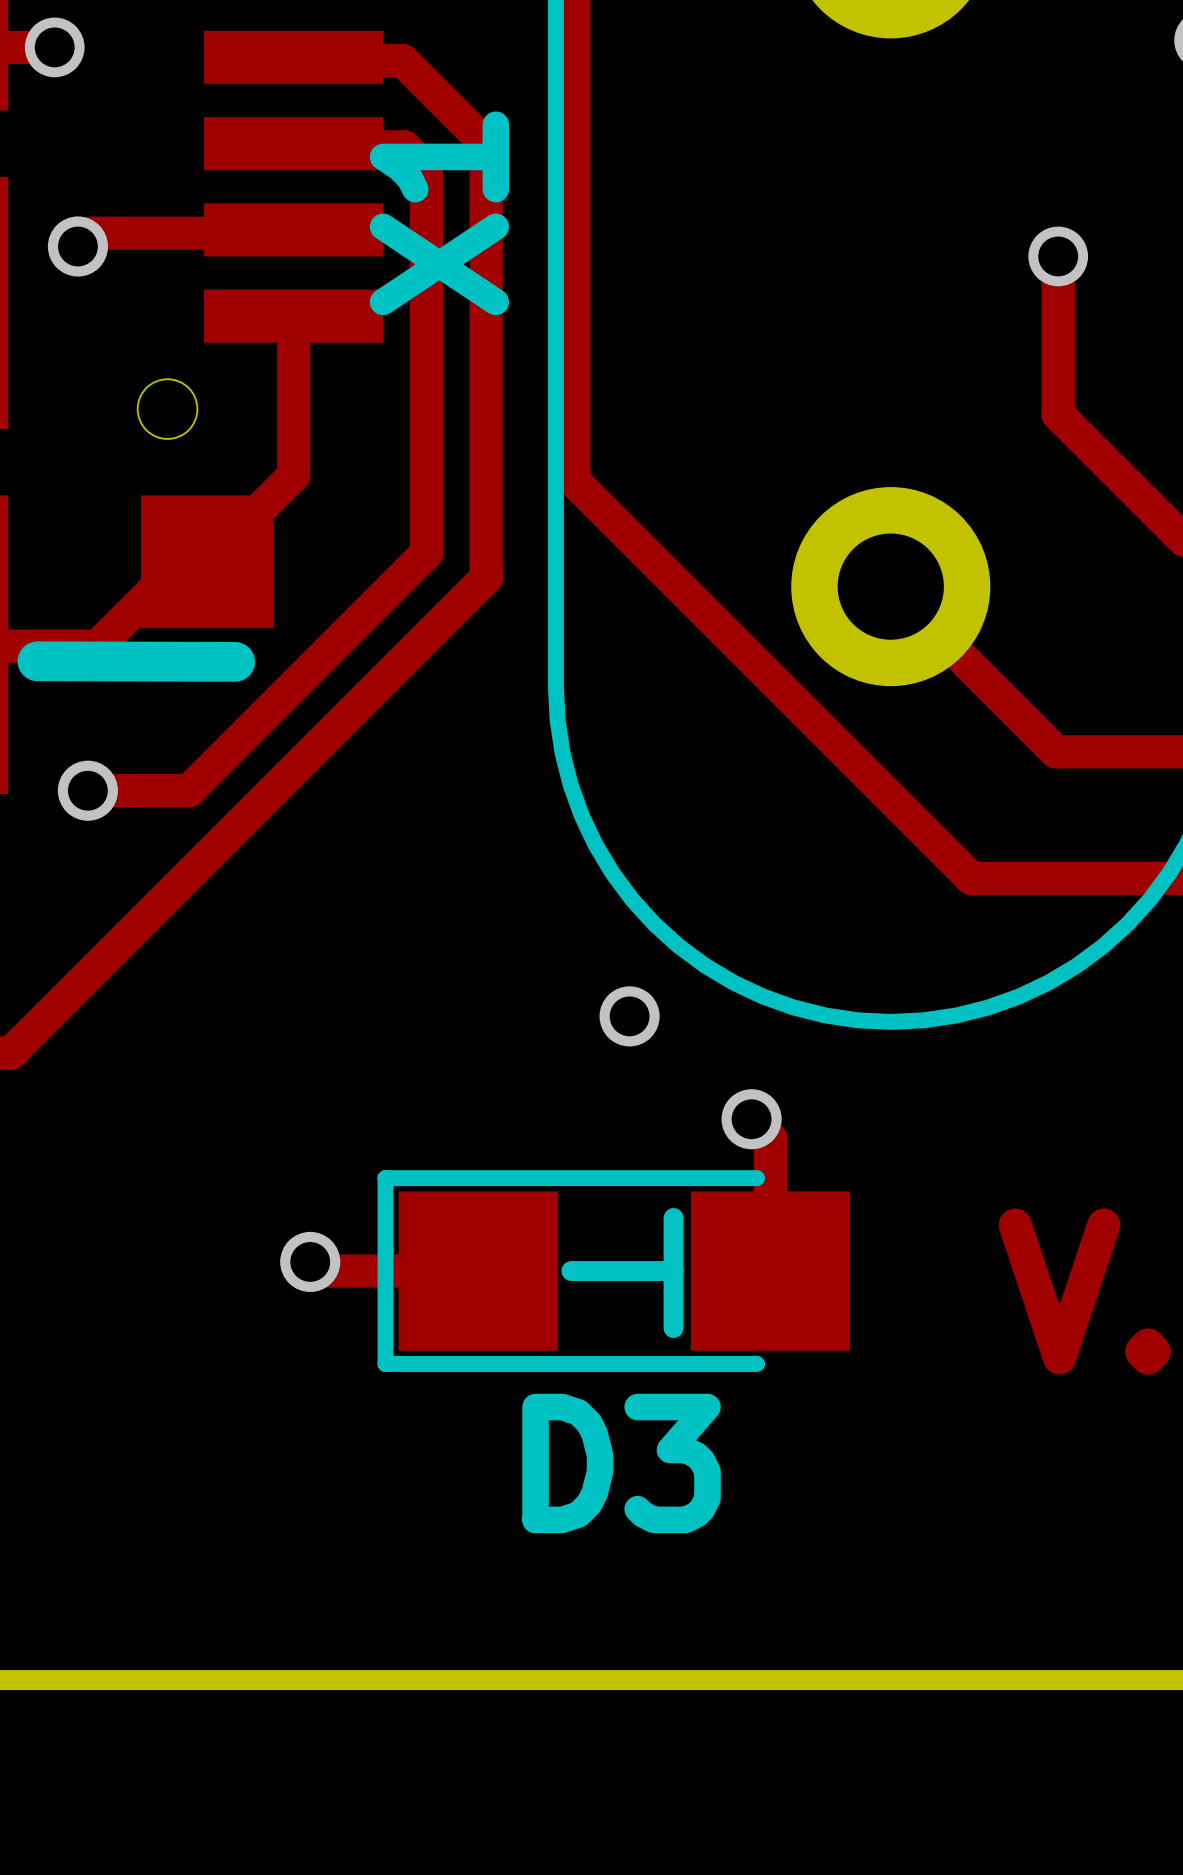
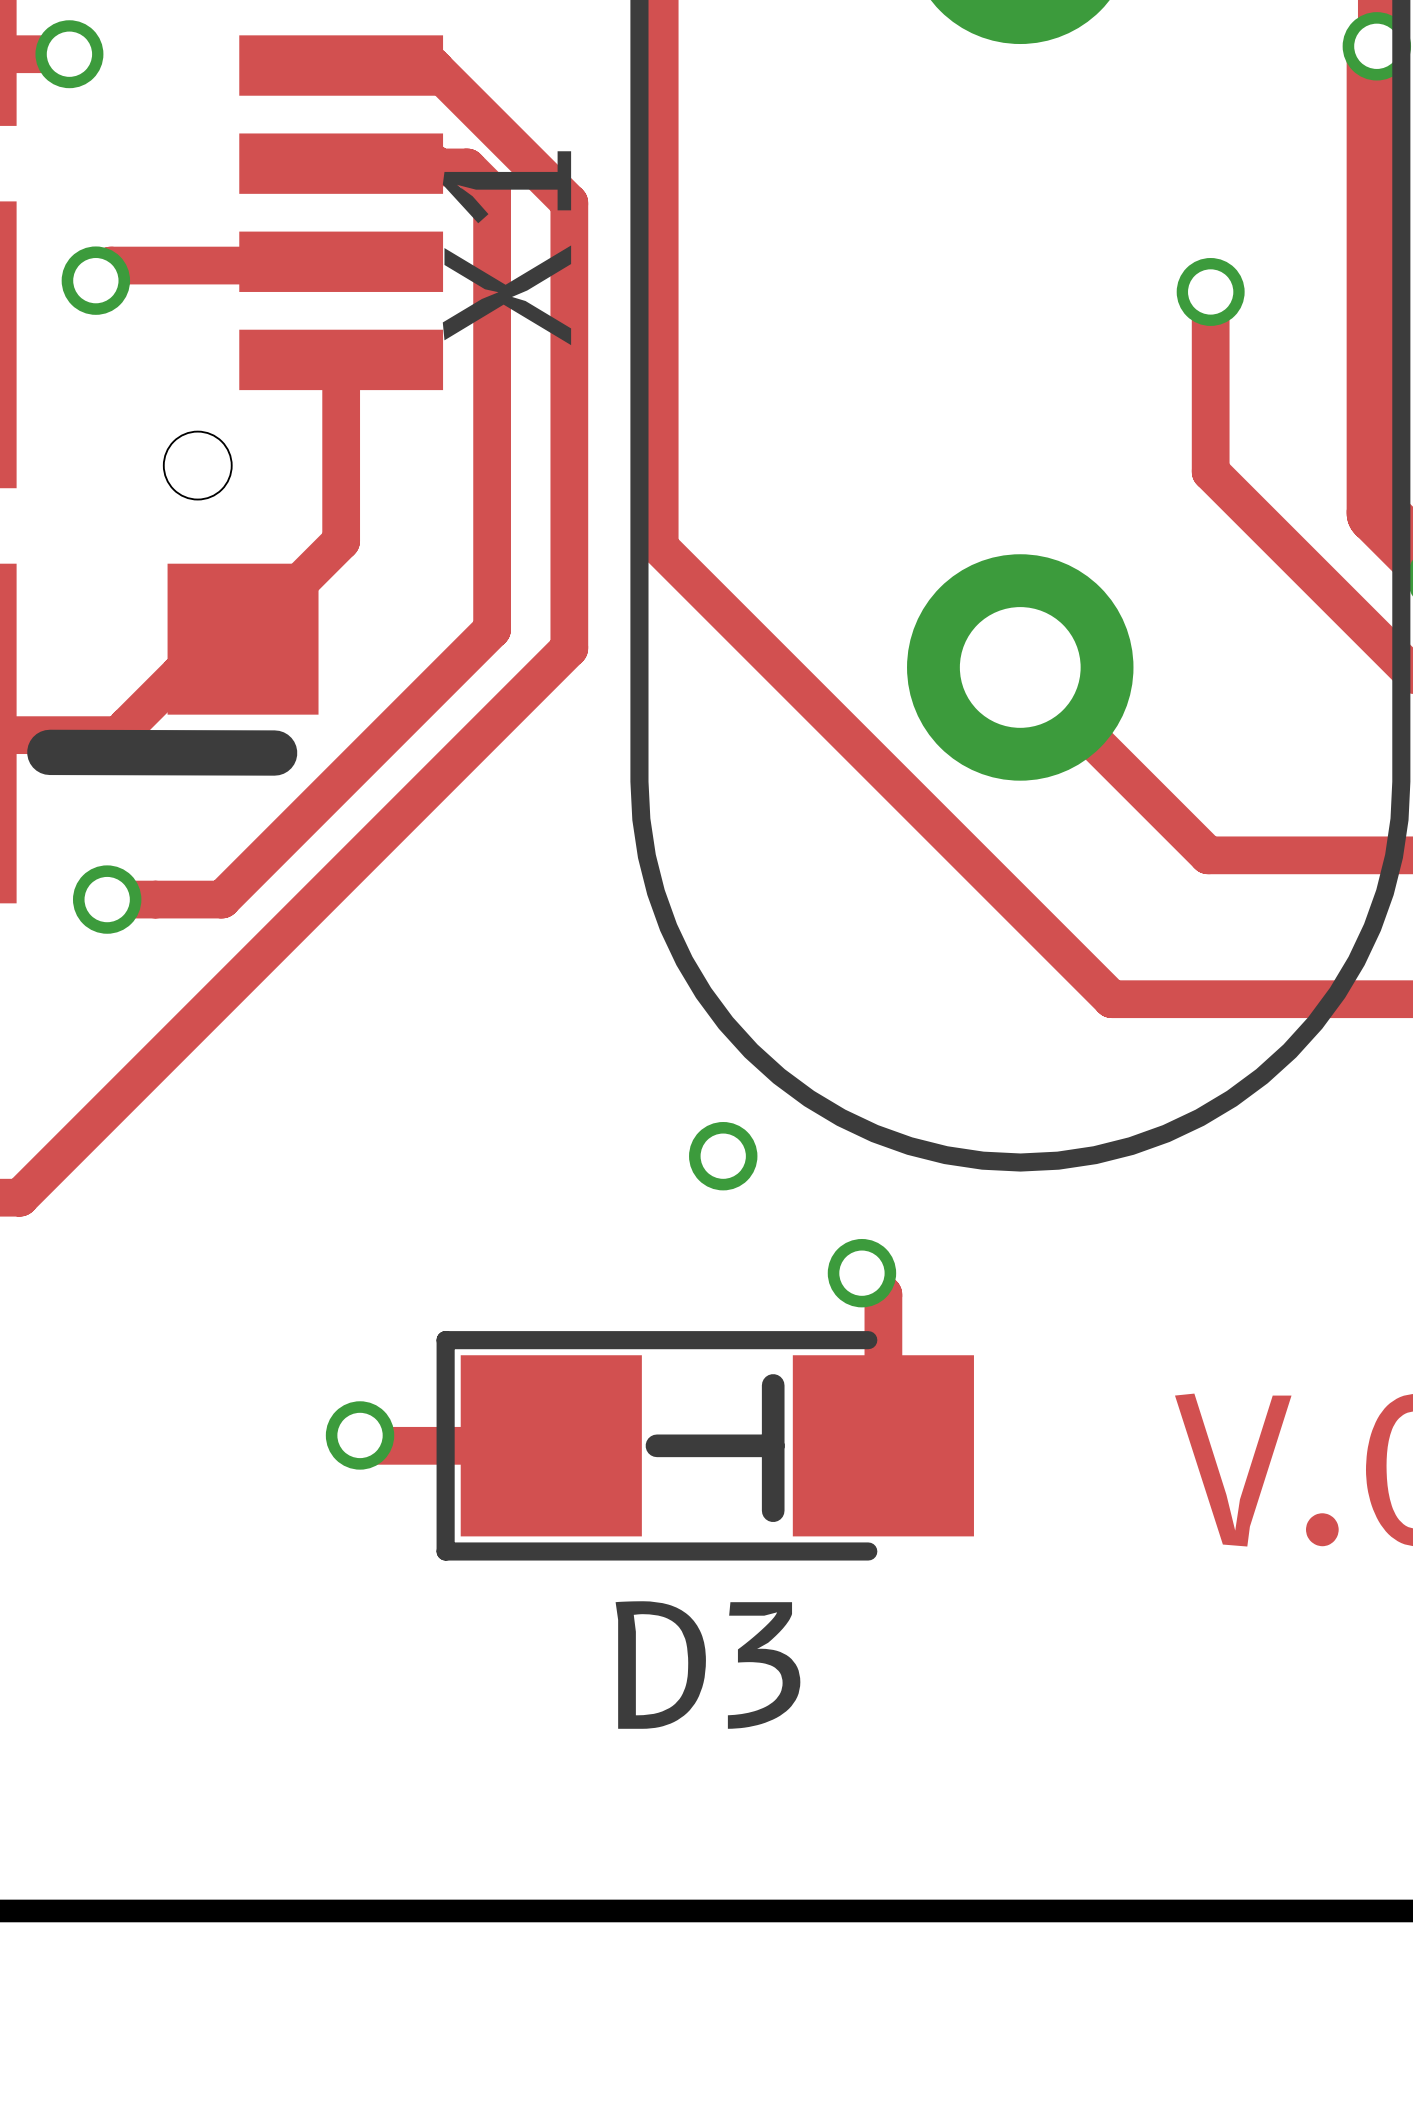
track: (376, 60) (402, 60) (486, 144) (486, 577) -> (435, 69) (569, 202) (569, 648) (560, 657)

